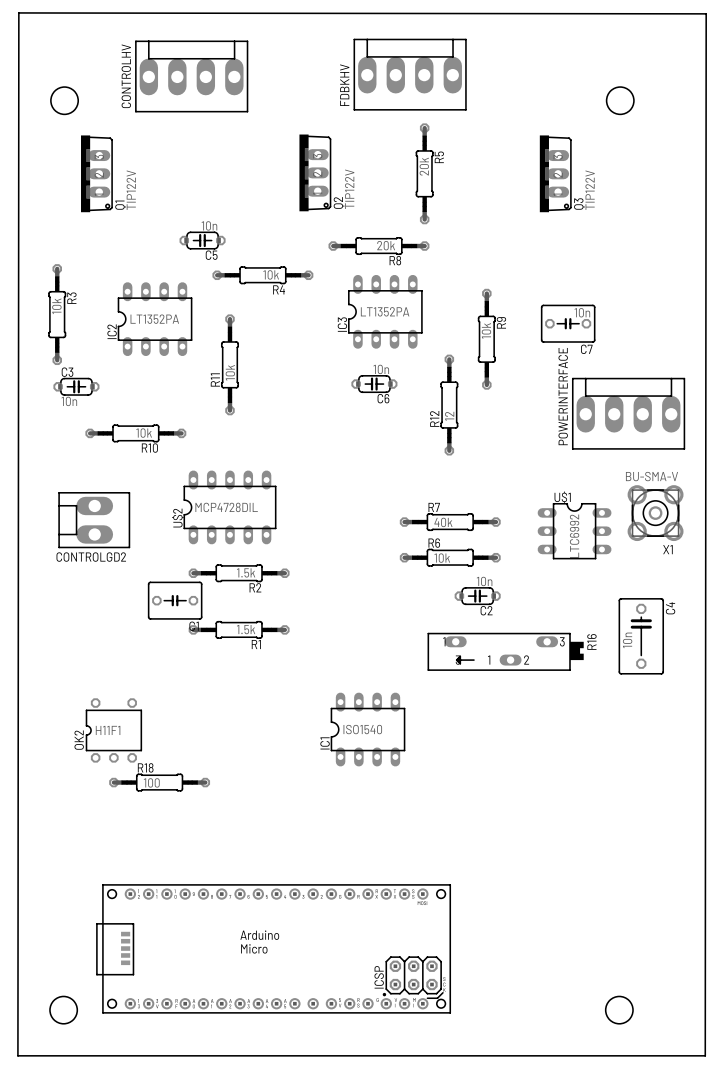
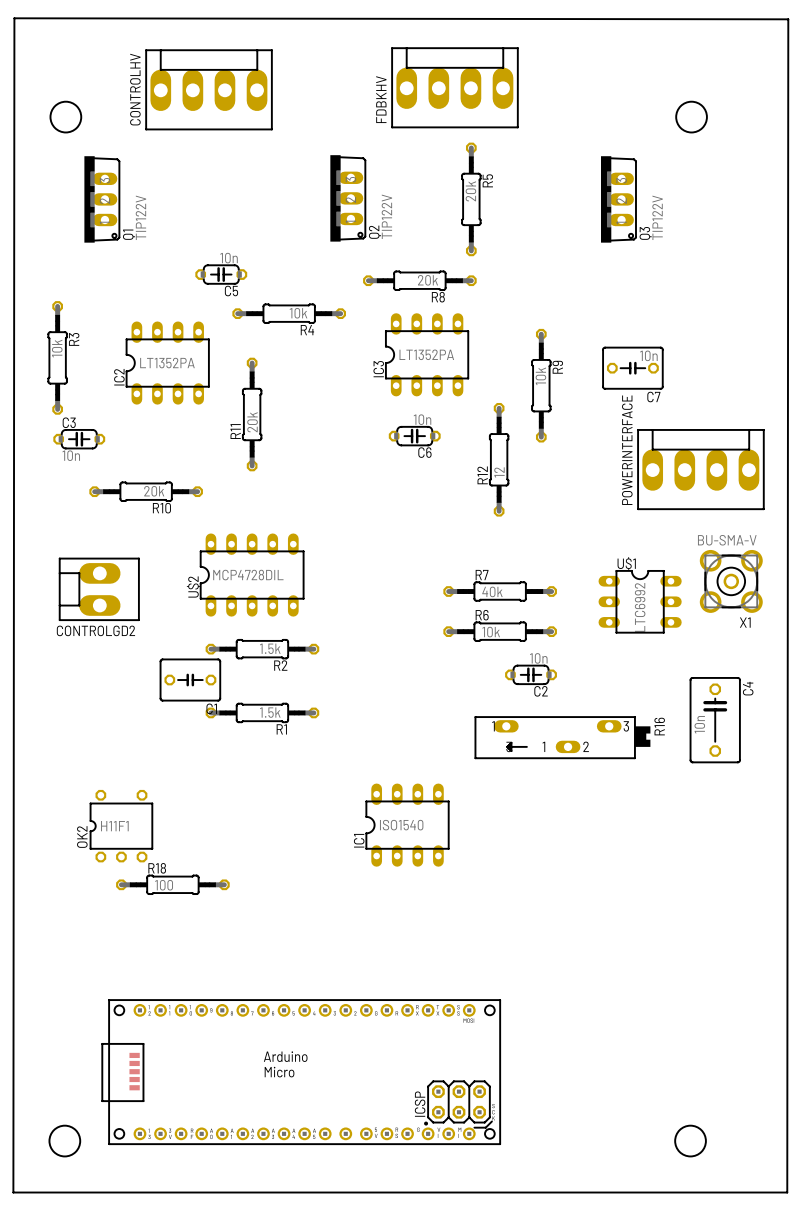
R11 value: 10k (230, 372) -> 20k (252, 422)
R10 value: 10k (144, 433) -> 20k (154, 491)

